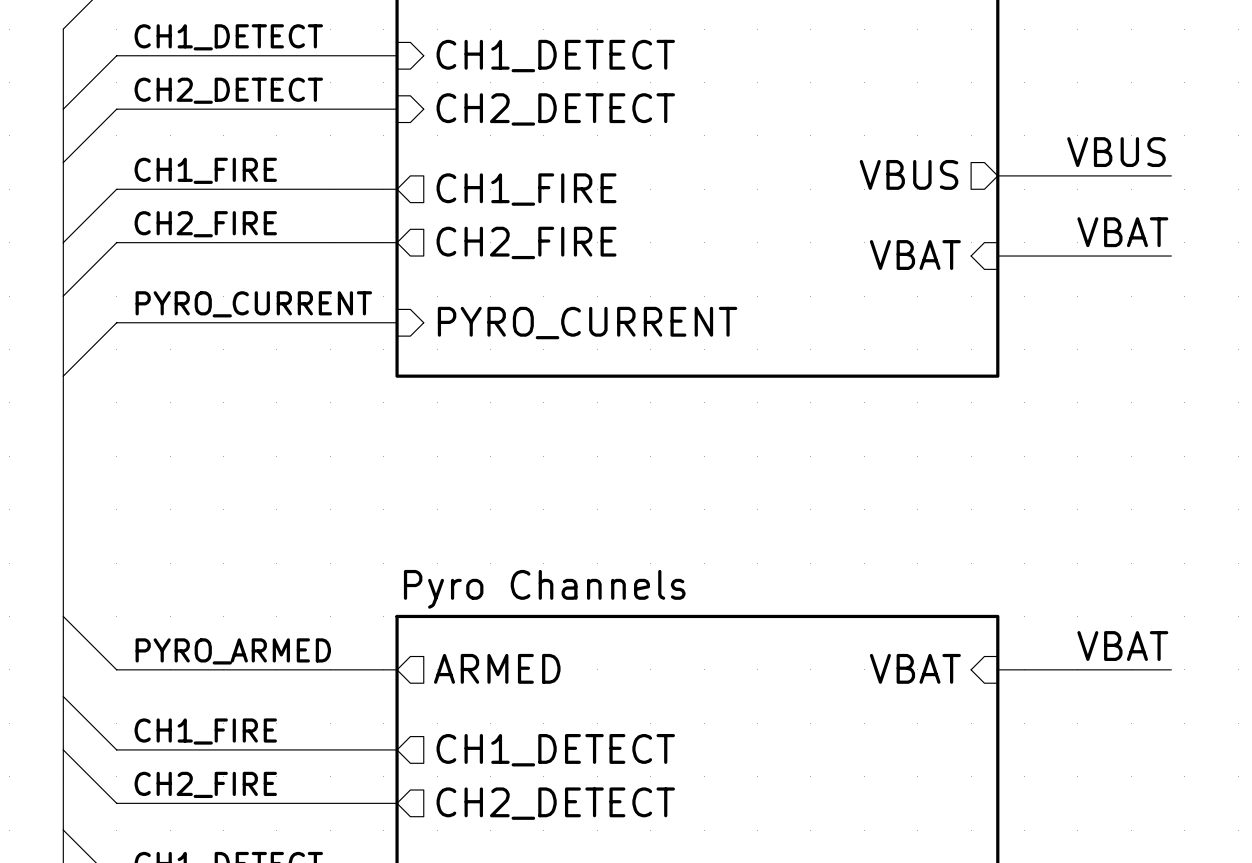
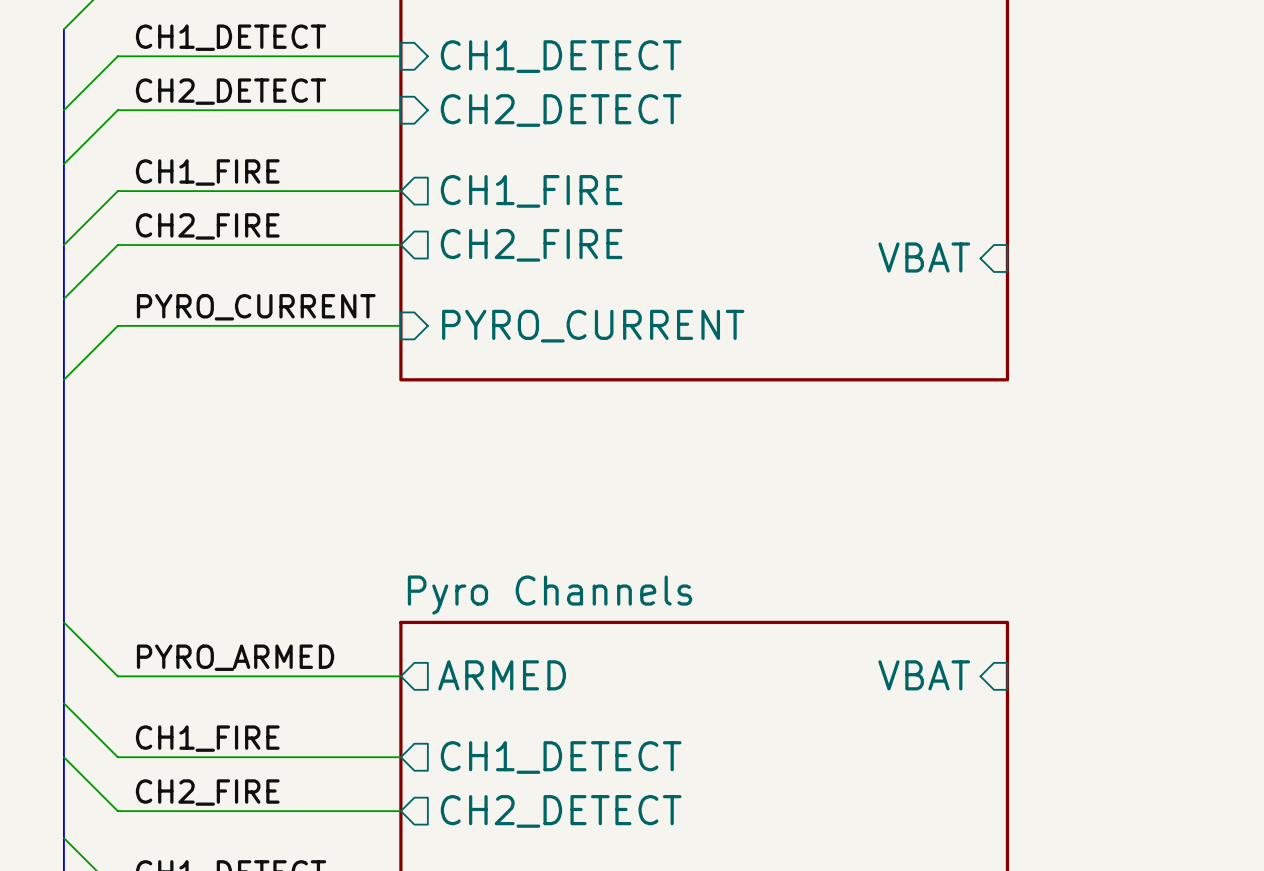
label: VBUS (1116, 152) -> none
sheet pin: VBUS (909, 174) -> none
wire: (997, 175) (1171, 175) -> none
label: VBAT (1122, 232) -> none
wire: (997, 256) (1171, 256) -> none
label: VBAT (1122, 646) -> none
wire: (997, 669) (1171, 669) -> none

